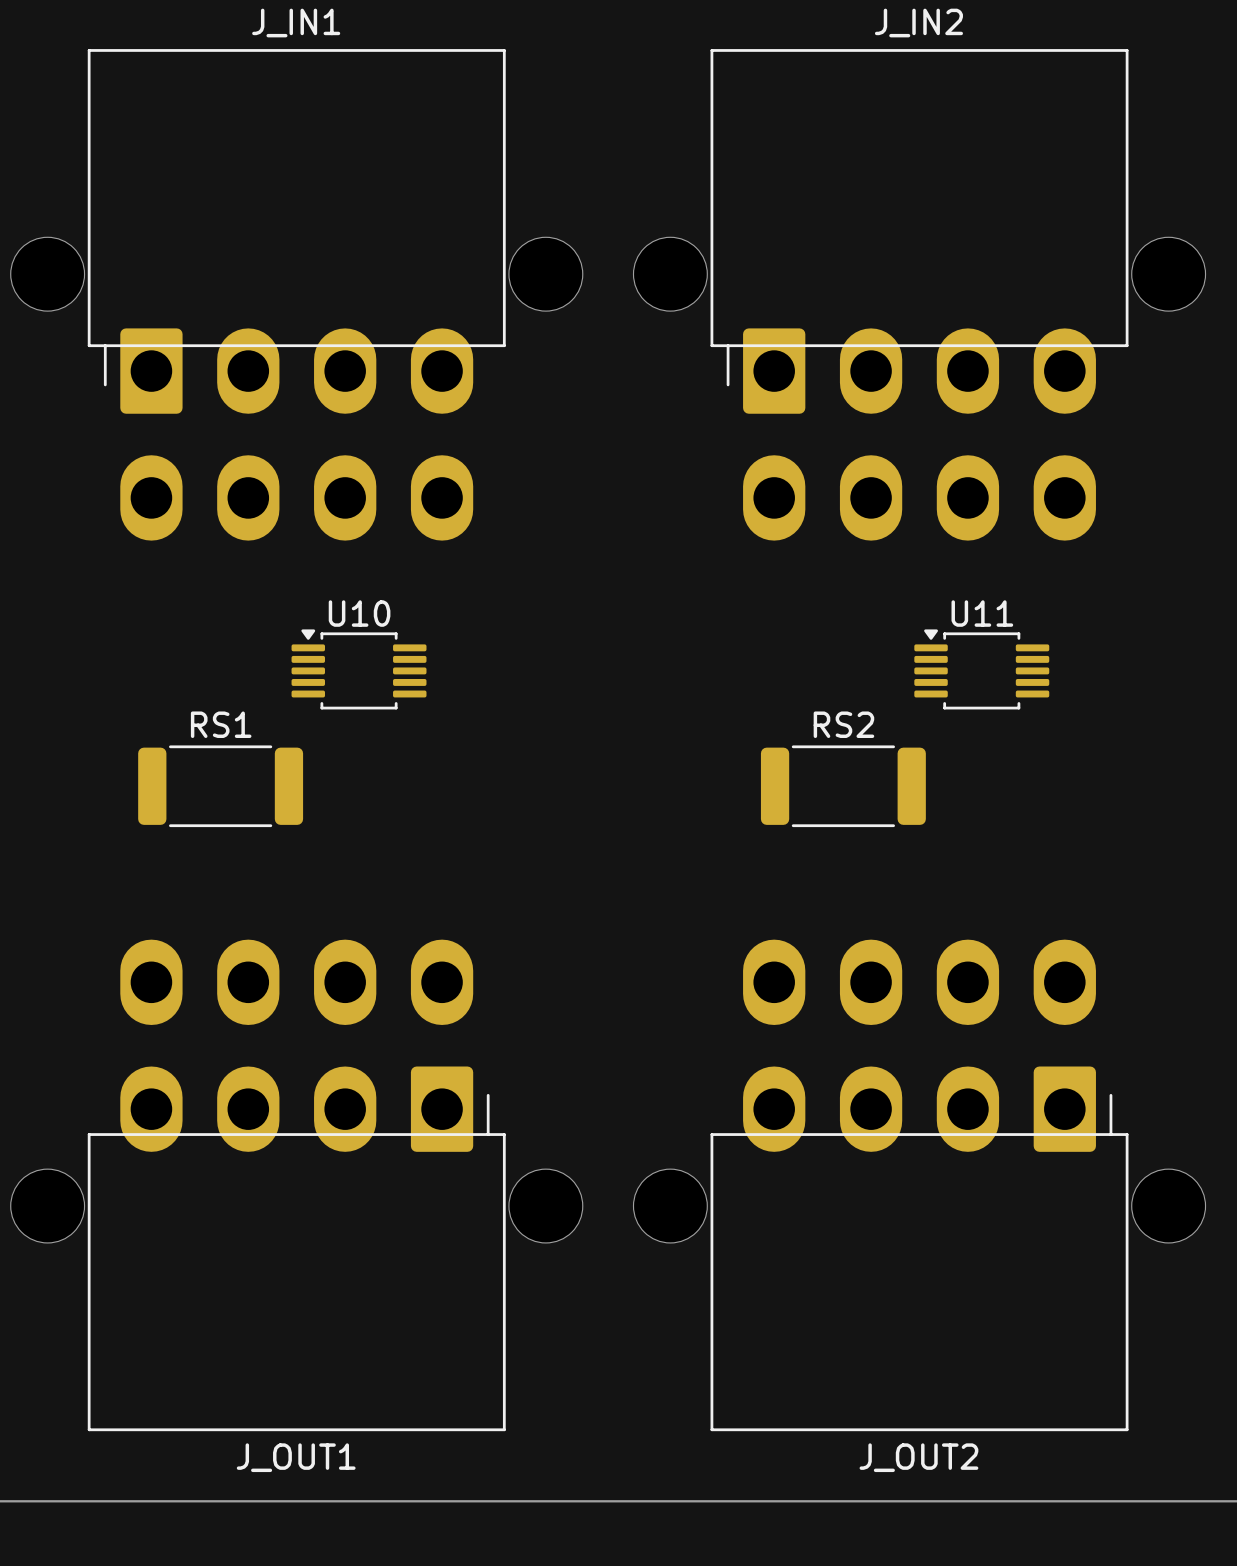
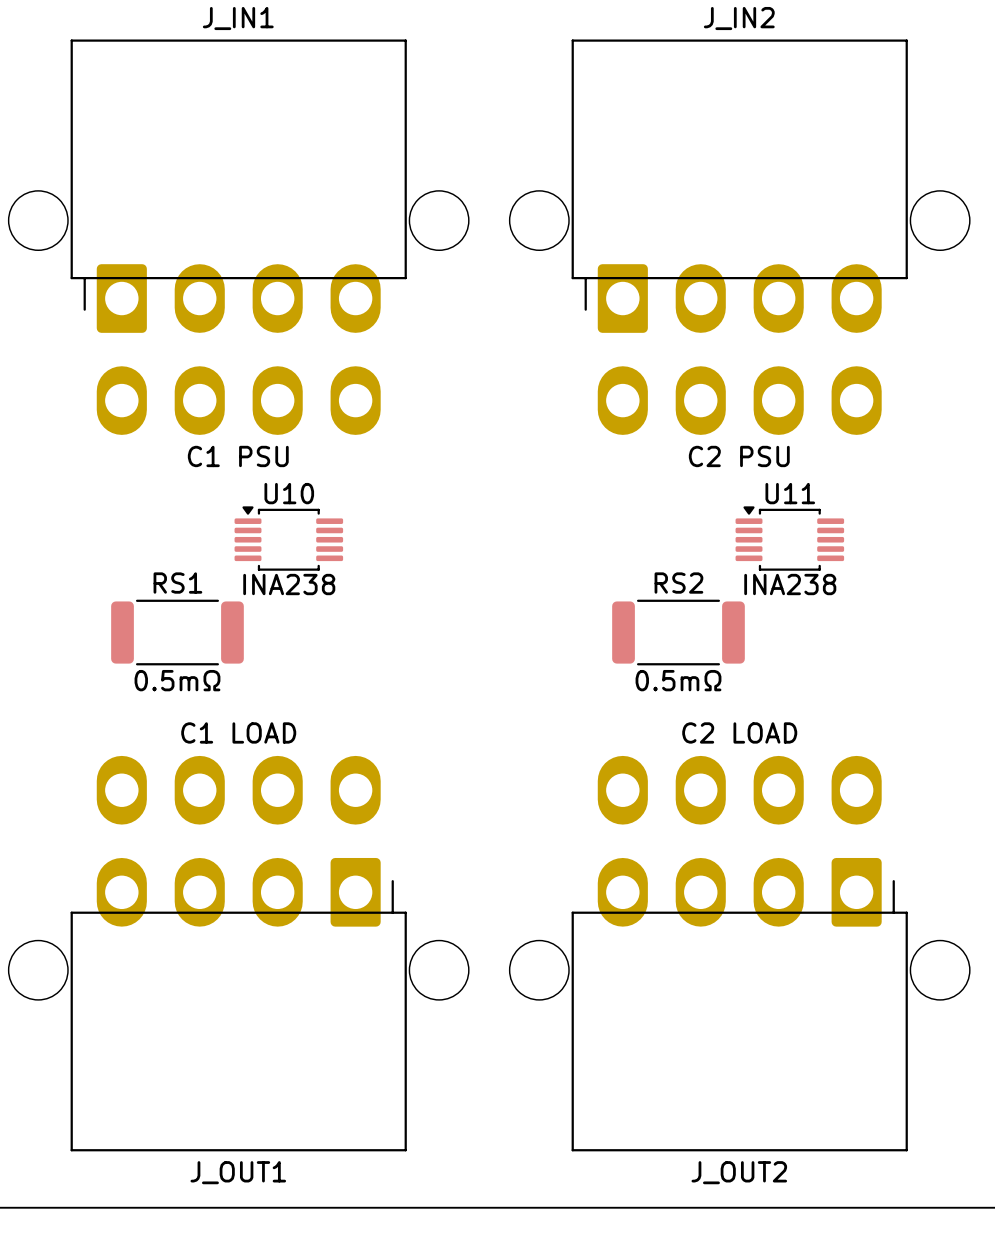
J_IN1 value: none -> C1 PSU (238, 456)
J_IN2 value: none -> C2 PSU (739, 456)
U10 value: none -> INA238 (289, 584)
U11 value: none -> INA238 (790, 584)
RS1 value: none -> 0.5mΩ (177, 680)
RS2 value: none -> 0.5mΩ (678, 680)
J_OUT1 value: none -> C1 LOAD (238, 732)
J_OUT2 value: none -> C2 LOAD (739, 732)

